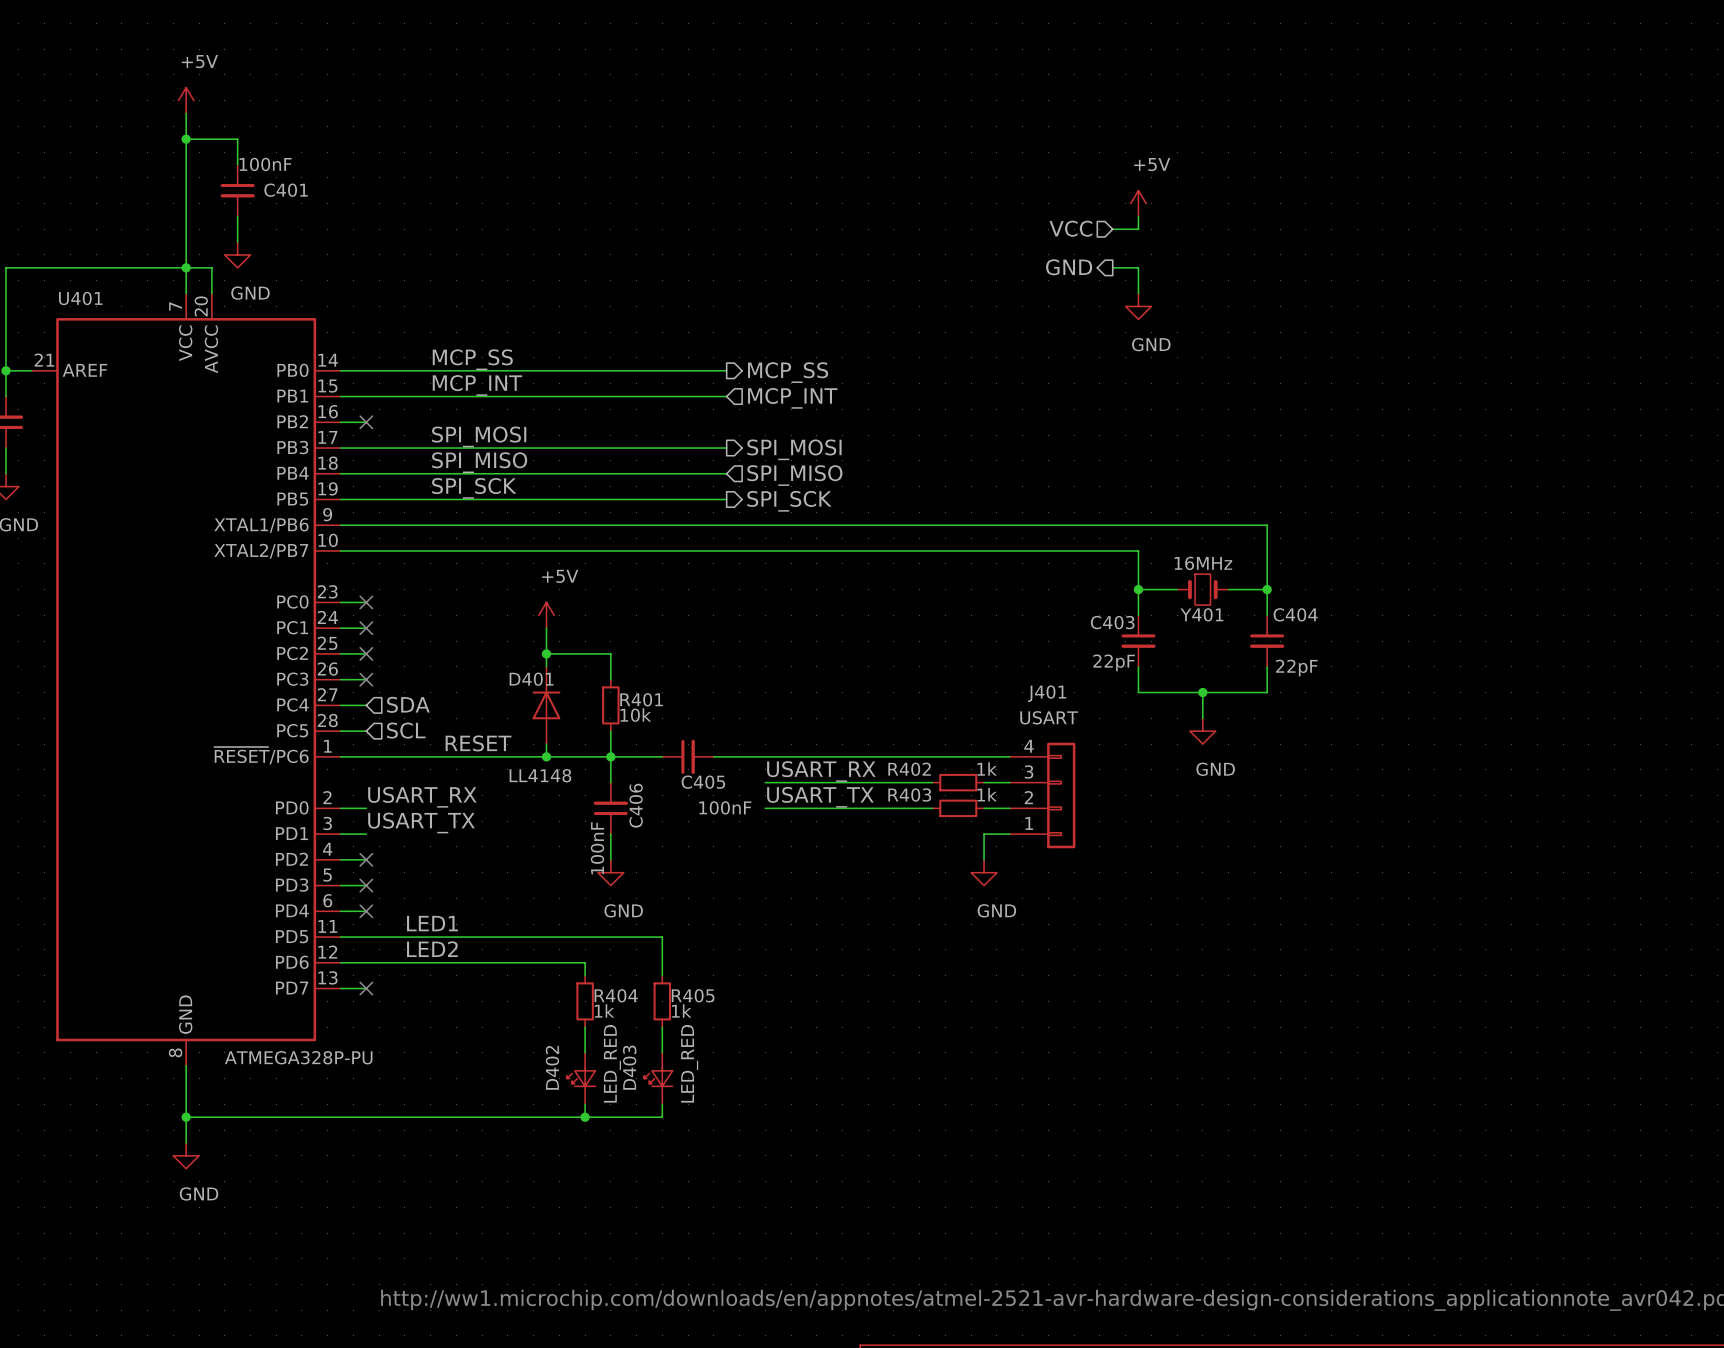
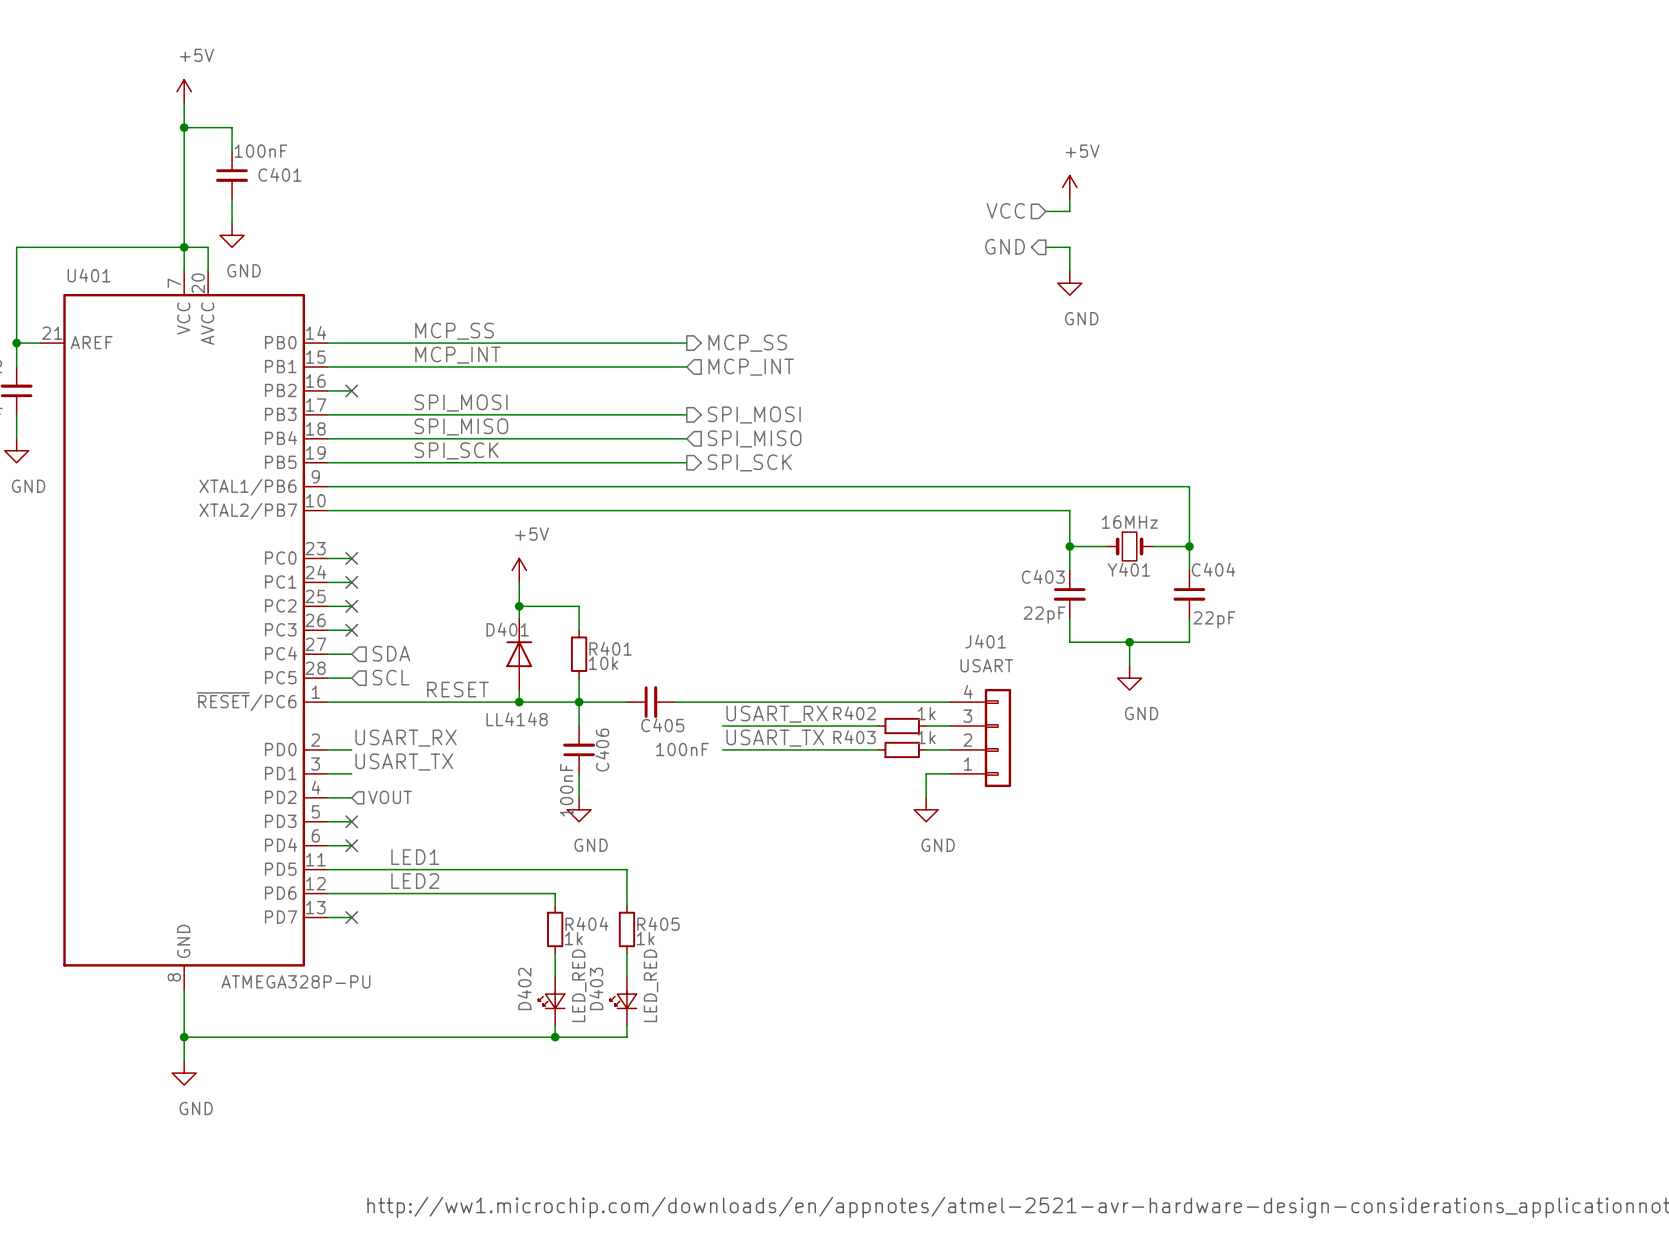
no-connect mark: (366, 859) -> none
hierarchical label: none -> VOUT (390, 797)

